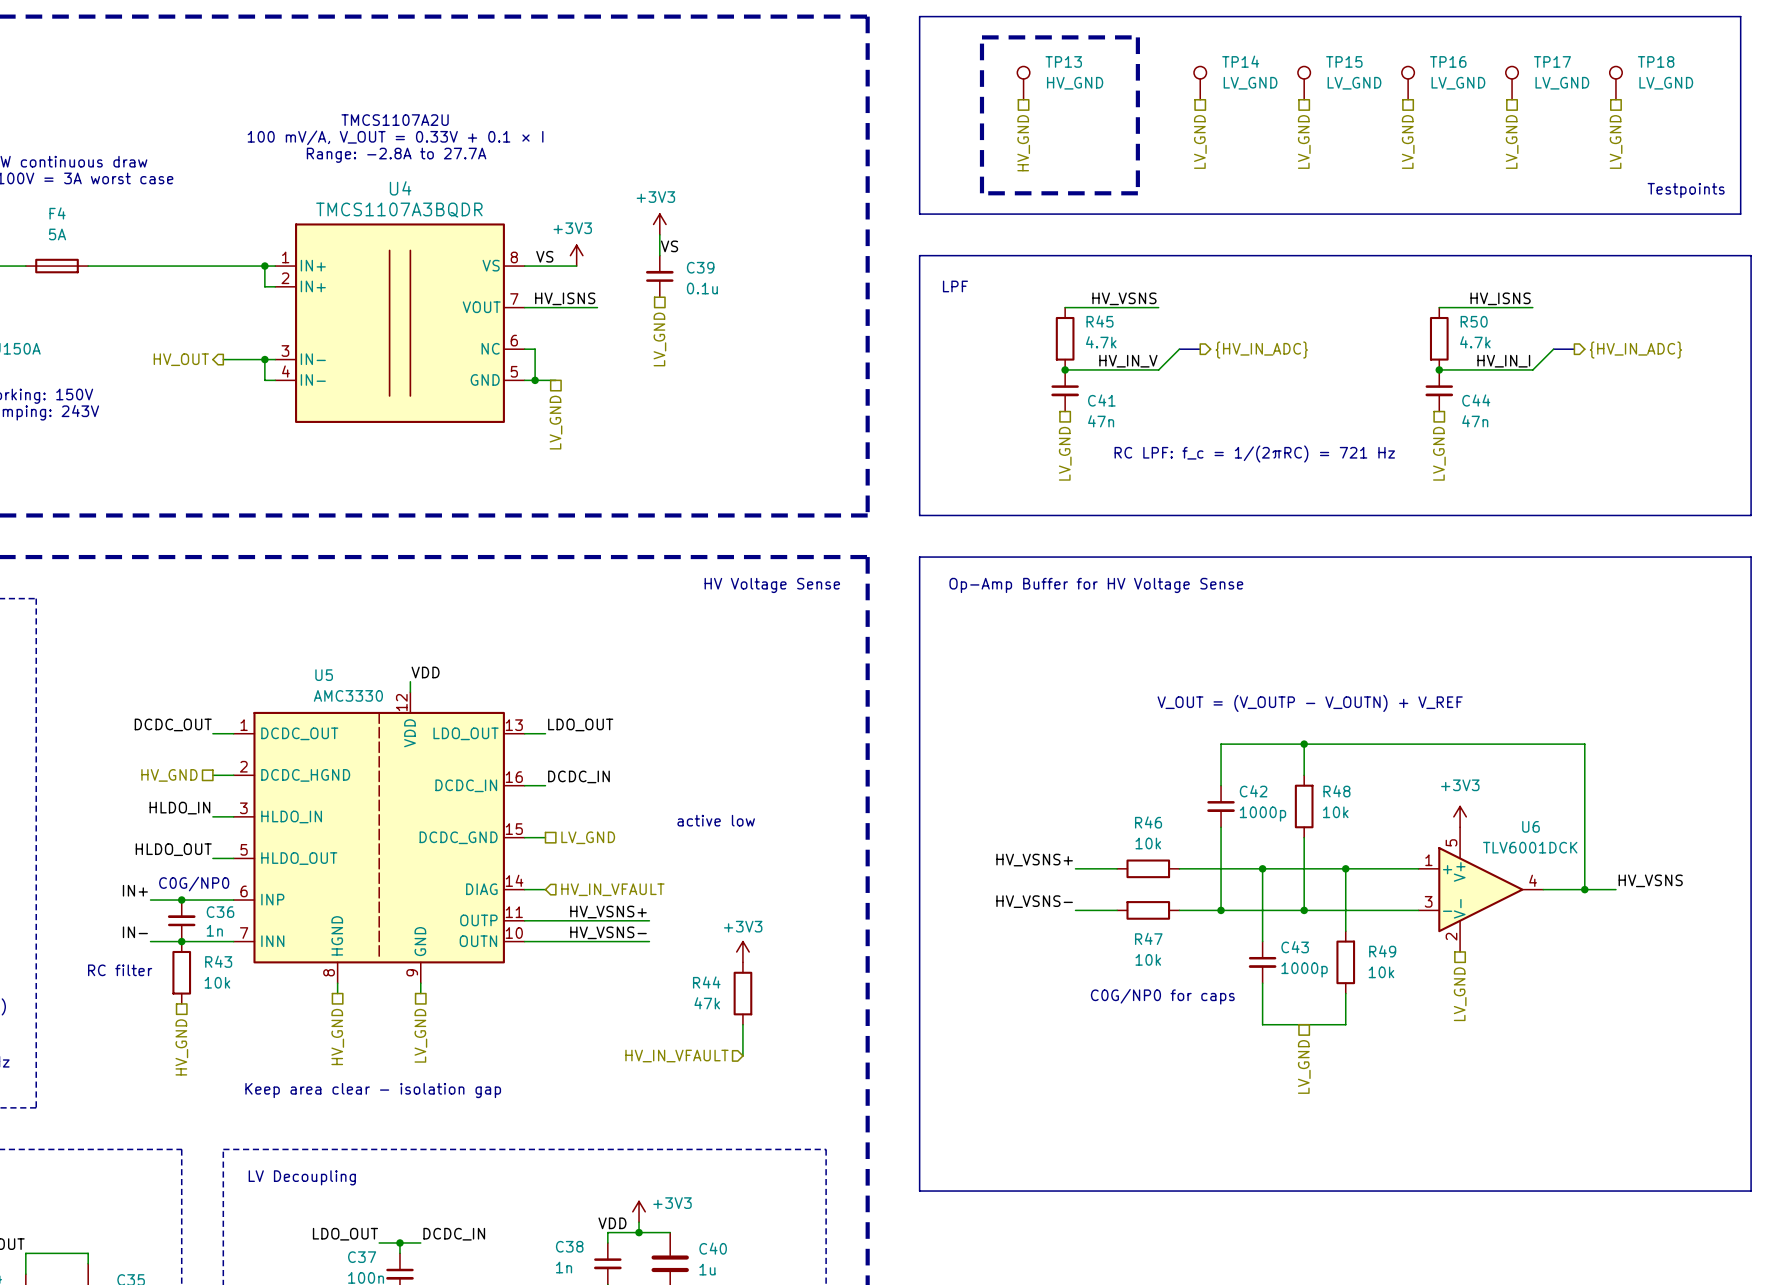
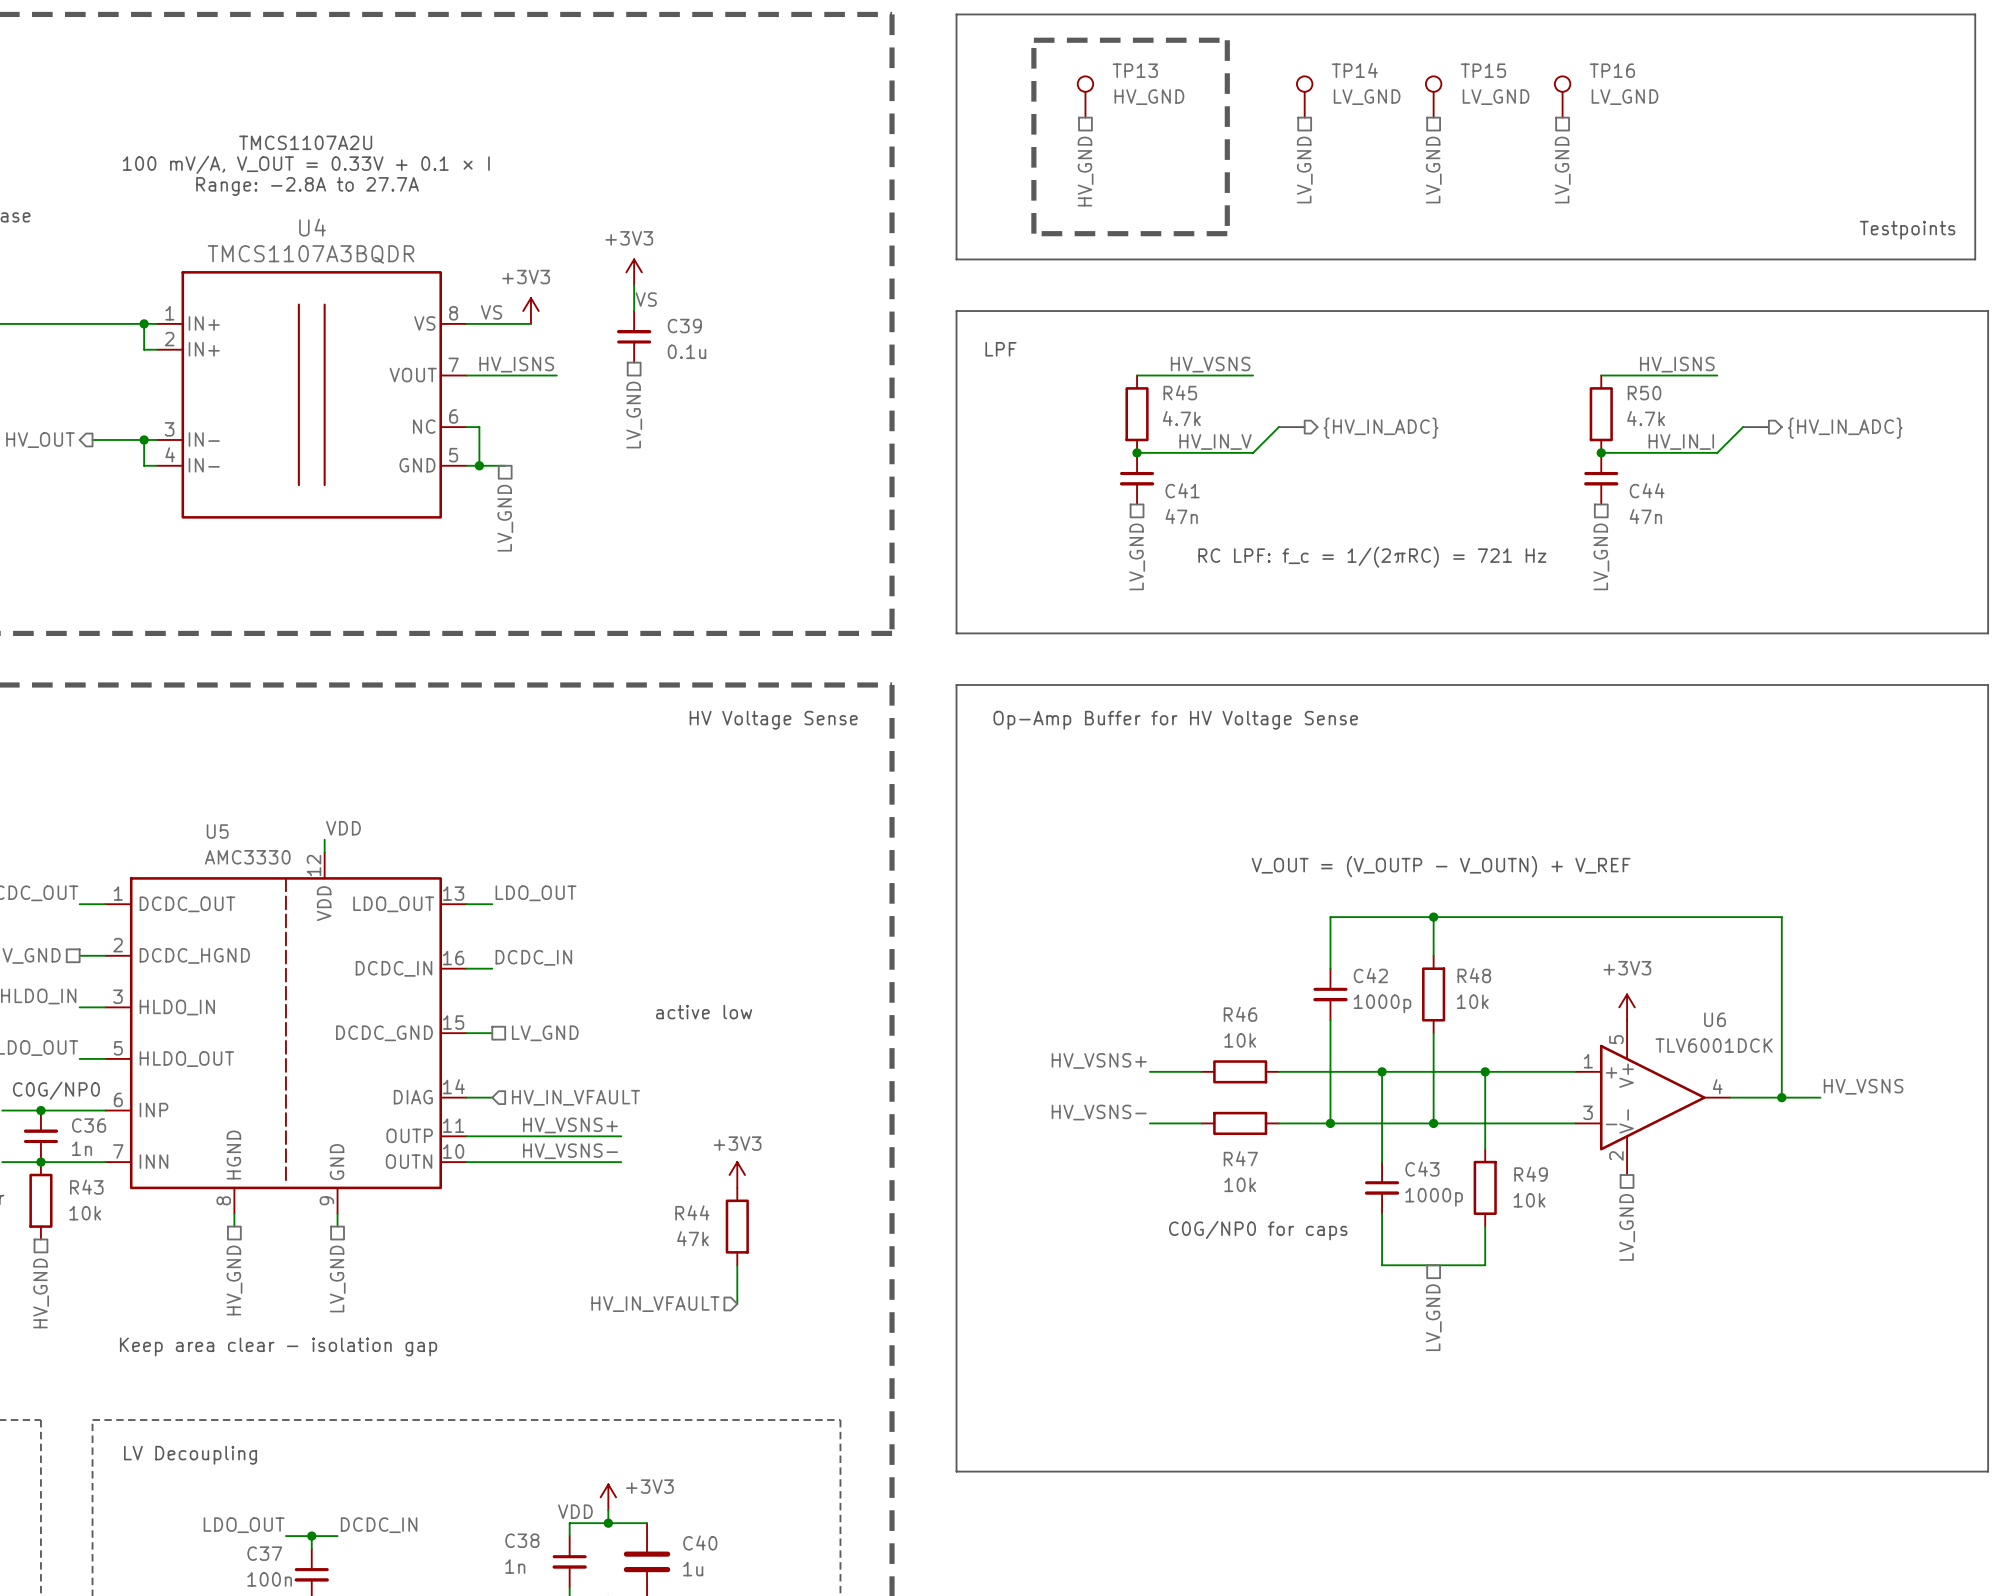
TP17: LV_GND (1512, 83) -> none
TP18: LV_GND (1615, 83) -> none
hierarchical label: LV_GND (1512, 141) -> none
hierarchical label: LV_GND (1616, 141) -> none

